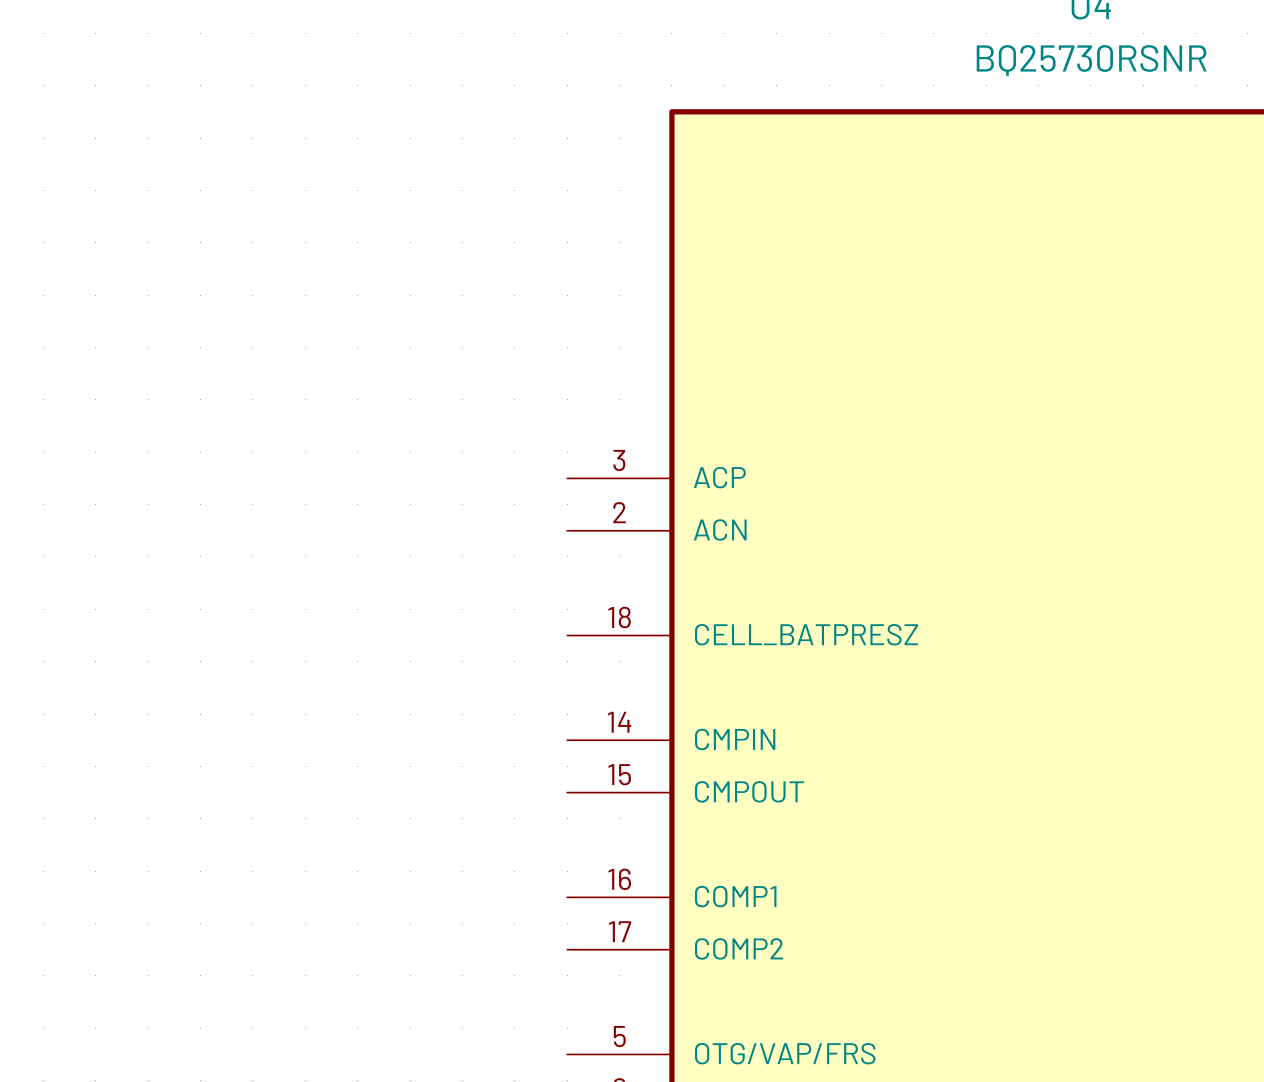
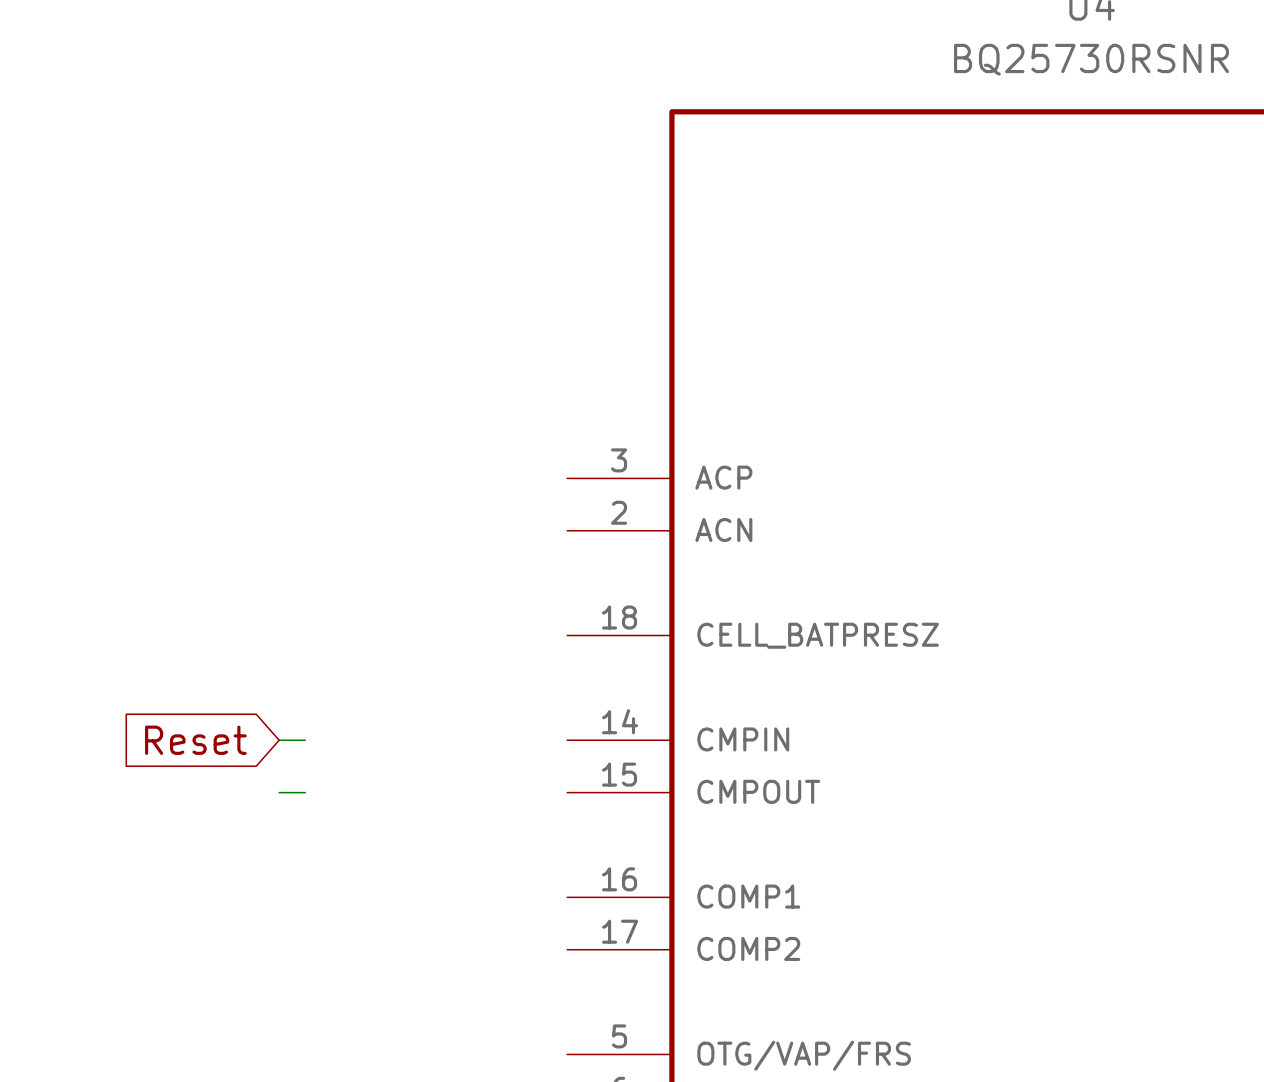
global label: none -> Reset (195, 740)
wire: none -> (279, 740) (305, 740)
wire: none -> (279, 792) (305, 792)

